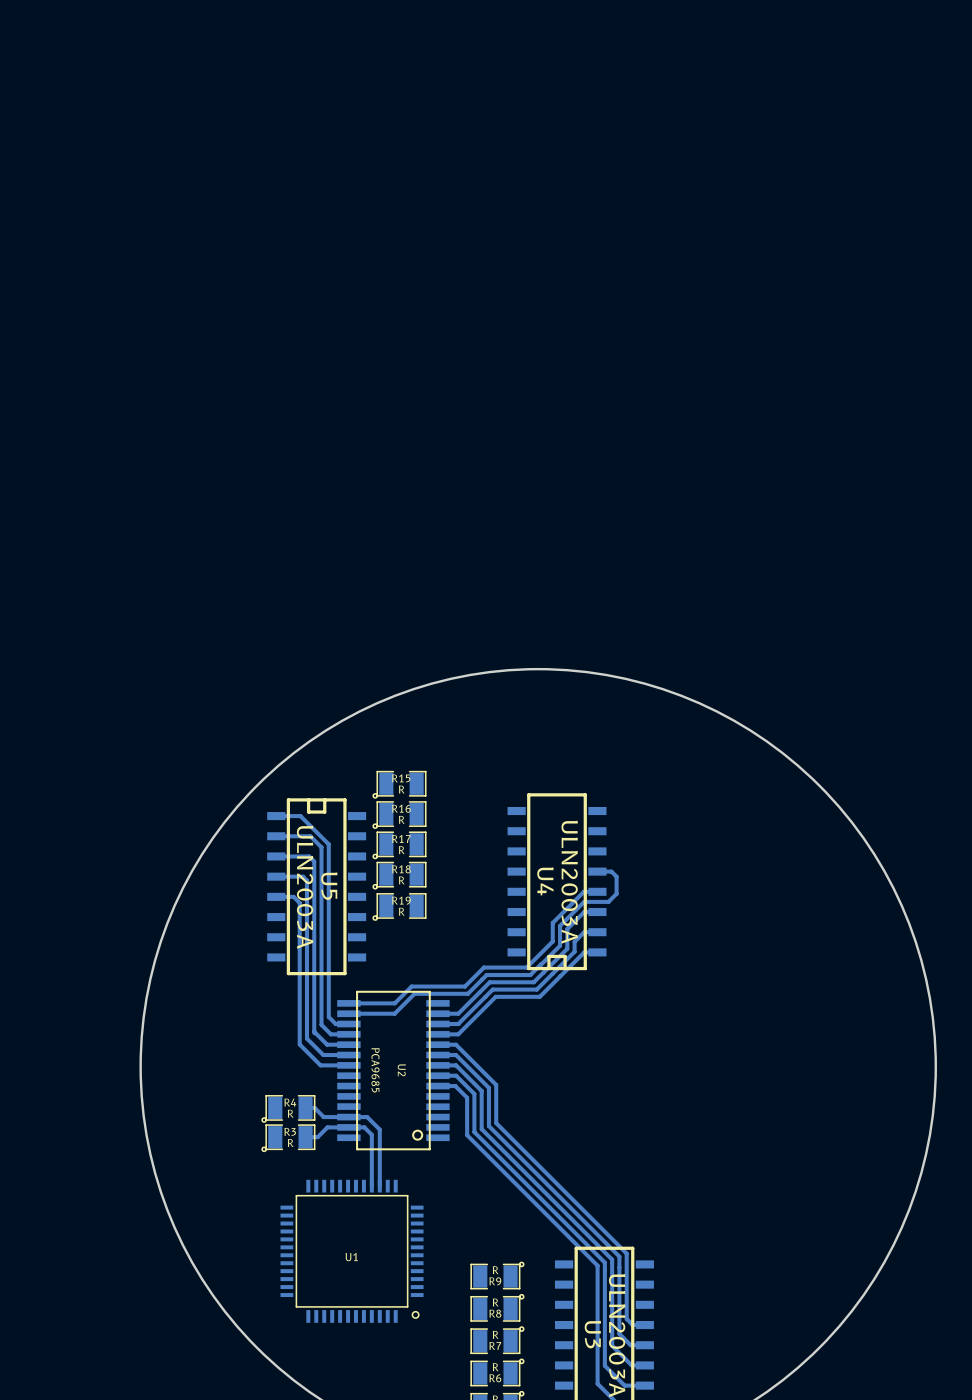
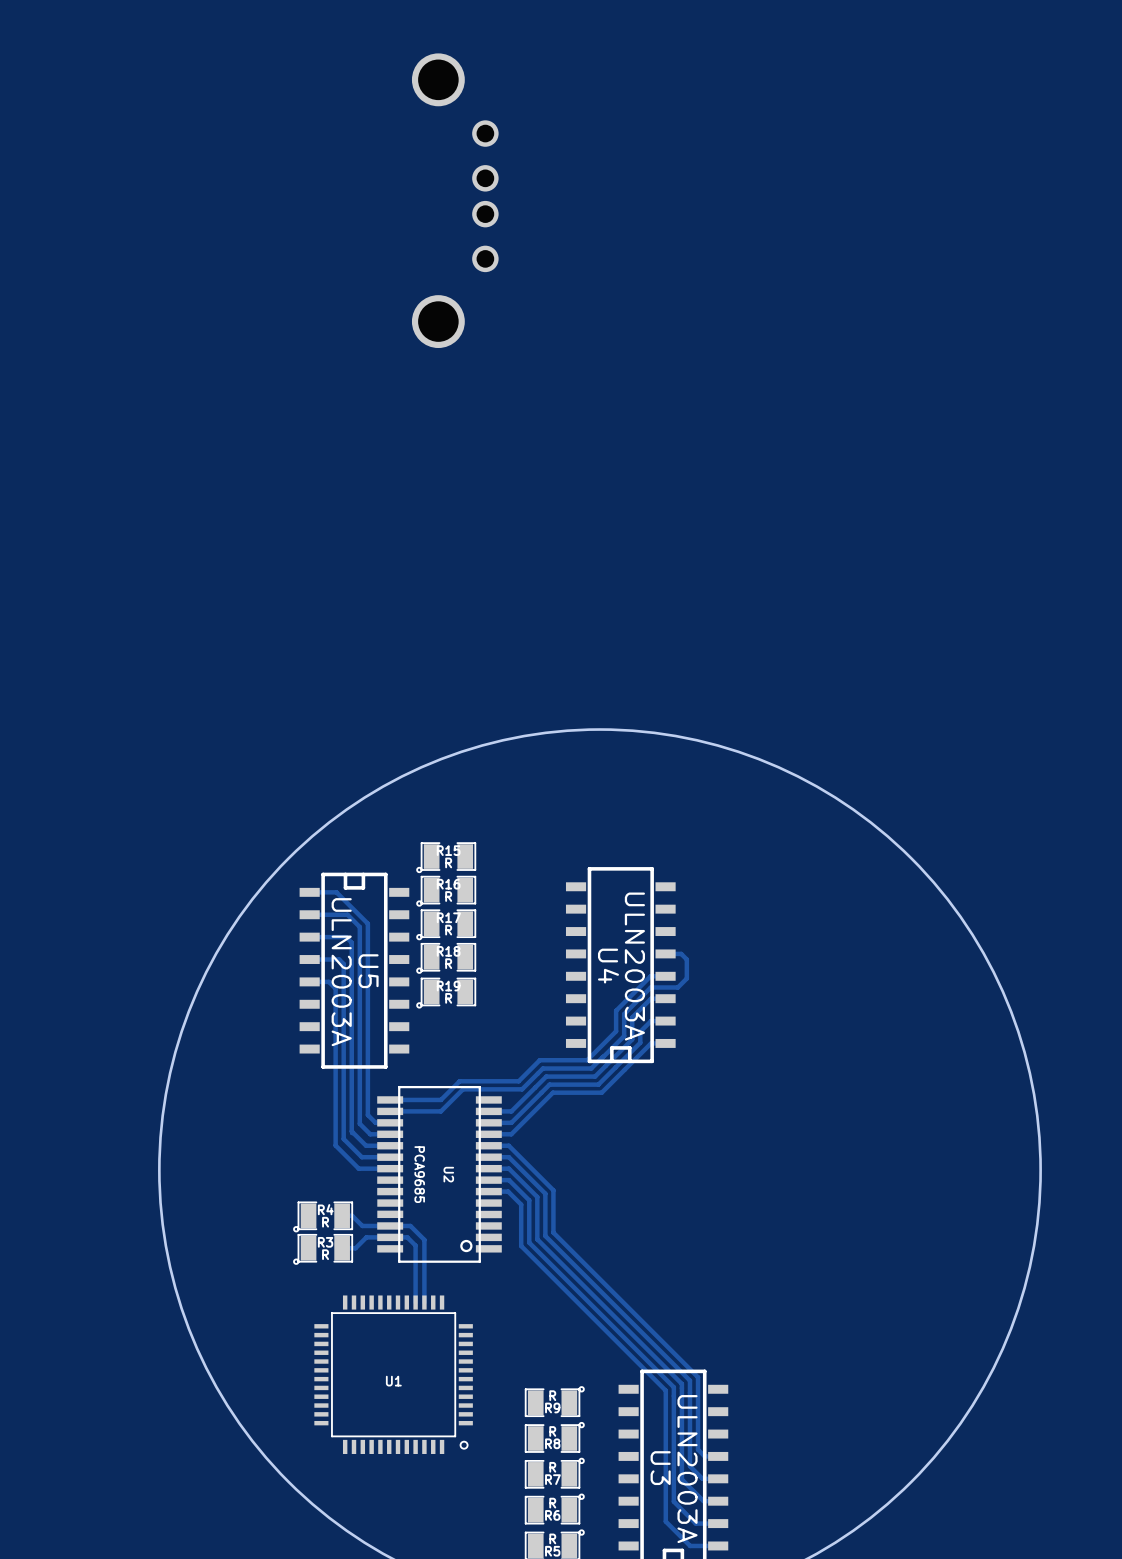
part: none -> (455, 200)

